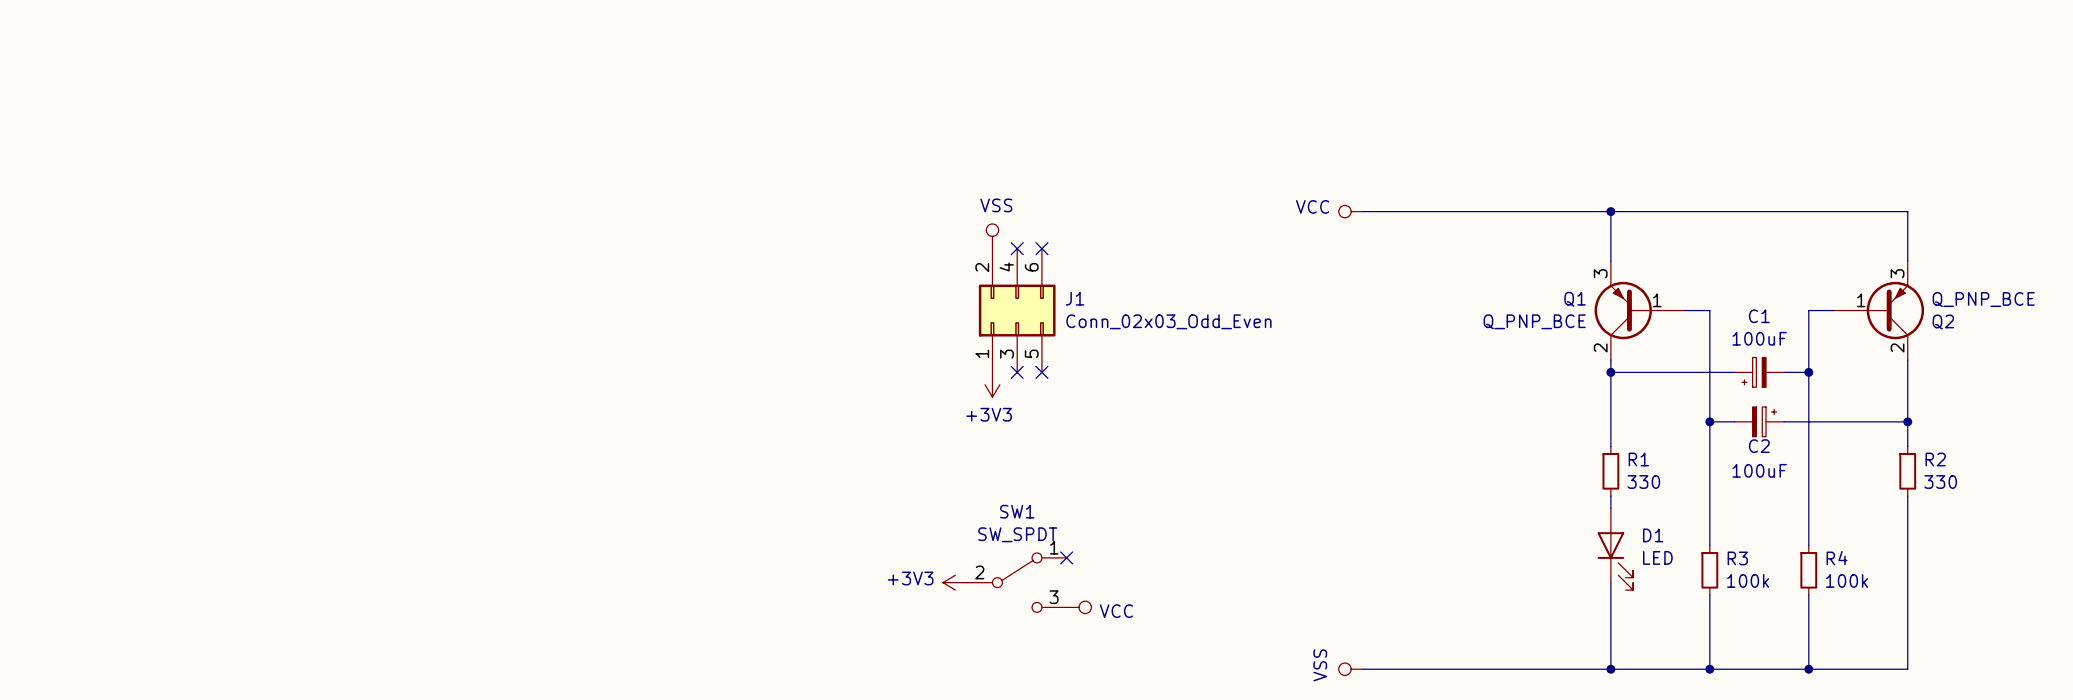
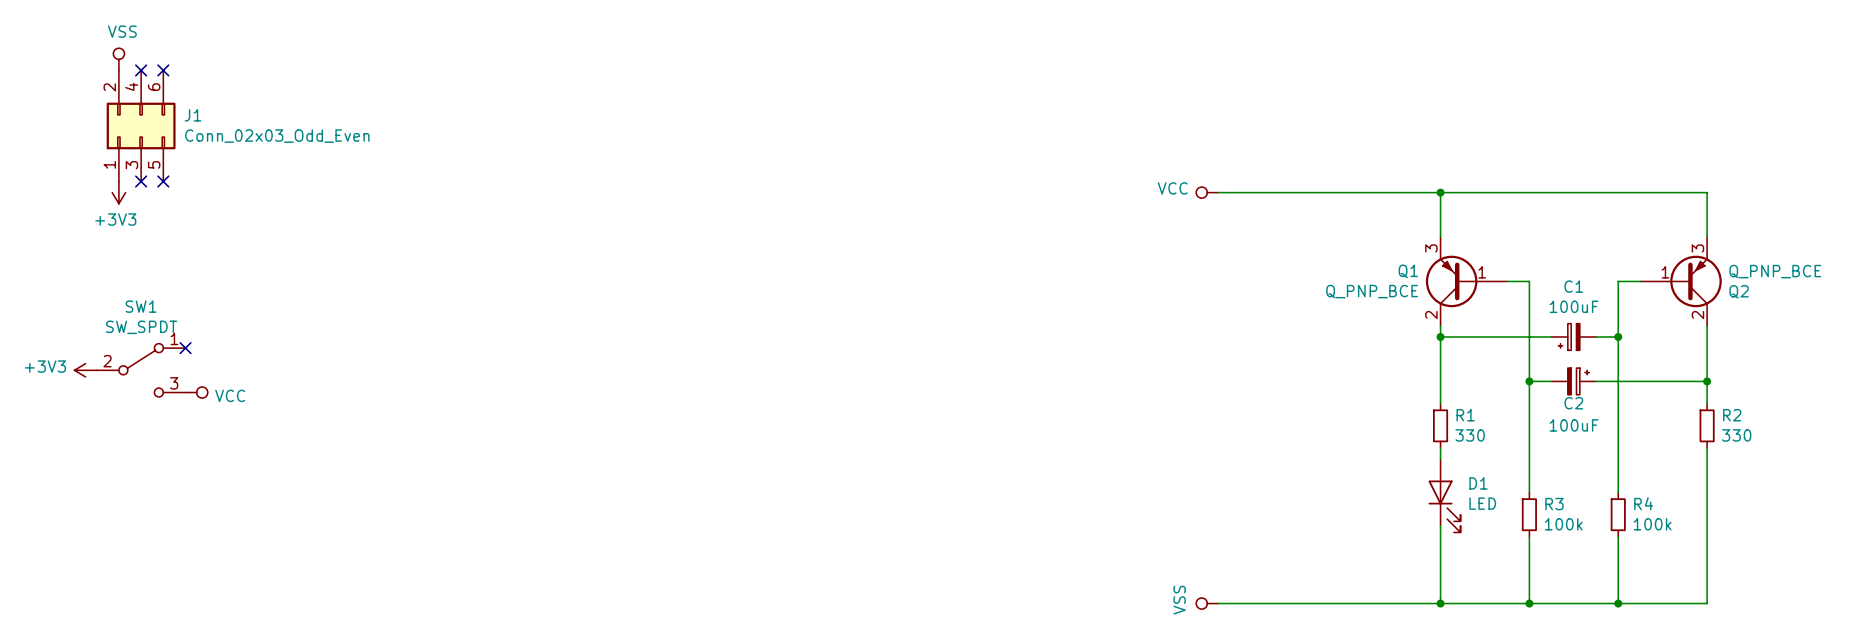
power symbol: none -> VSS (118, 59)
no-connect mark: none -> (141, 70)
no-connect mark: none -> (163, 70)
no-connect mark: none -> (141, 181)
no-connect mark: none -> (163, 181)
power symbol: none -> +3V3 (118, 192)
power symbol: VSS (992, 236) -> none
no-connect mark: (1017, 248) -> none
no-connect mark: (1041, 248) -> none
J1 position: (1017, 310) -> (141, 125)
no-connect mark: (1017, 372) -> none
no-connect mark: (1041, 372) -> none
no-connect mark: none -> (185, 348)
power symbol: +3V3 (992, 384) -> none
power symbol: none -> +3V3 (85, 370)
power symbol: none -> VCC (196, 392)
no-connect mark: (1066, 557) -> none
power symbol: +3V3 (955, 582) -> none
SW1 position: (1017, 582) -> (141, 370)
power symbol: VCC (1079, 607) -> none

